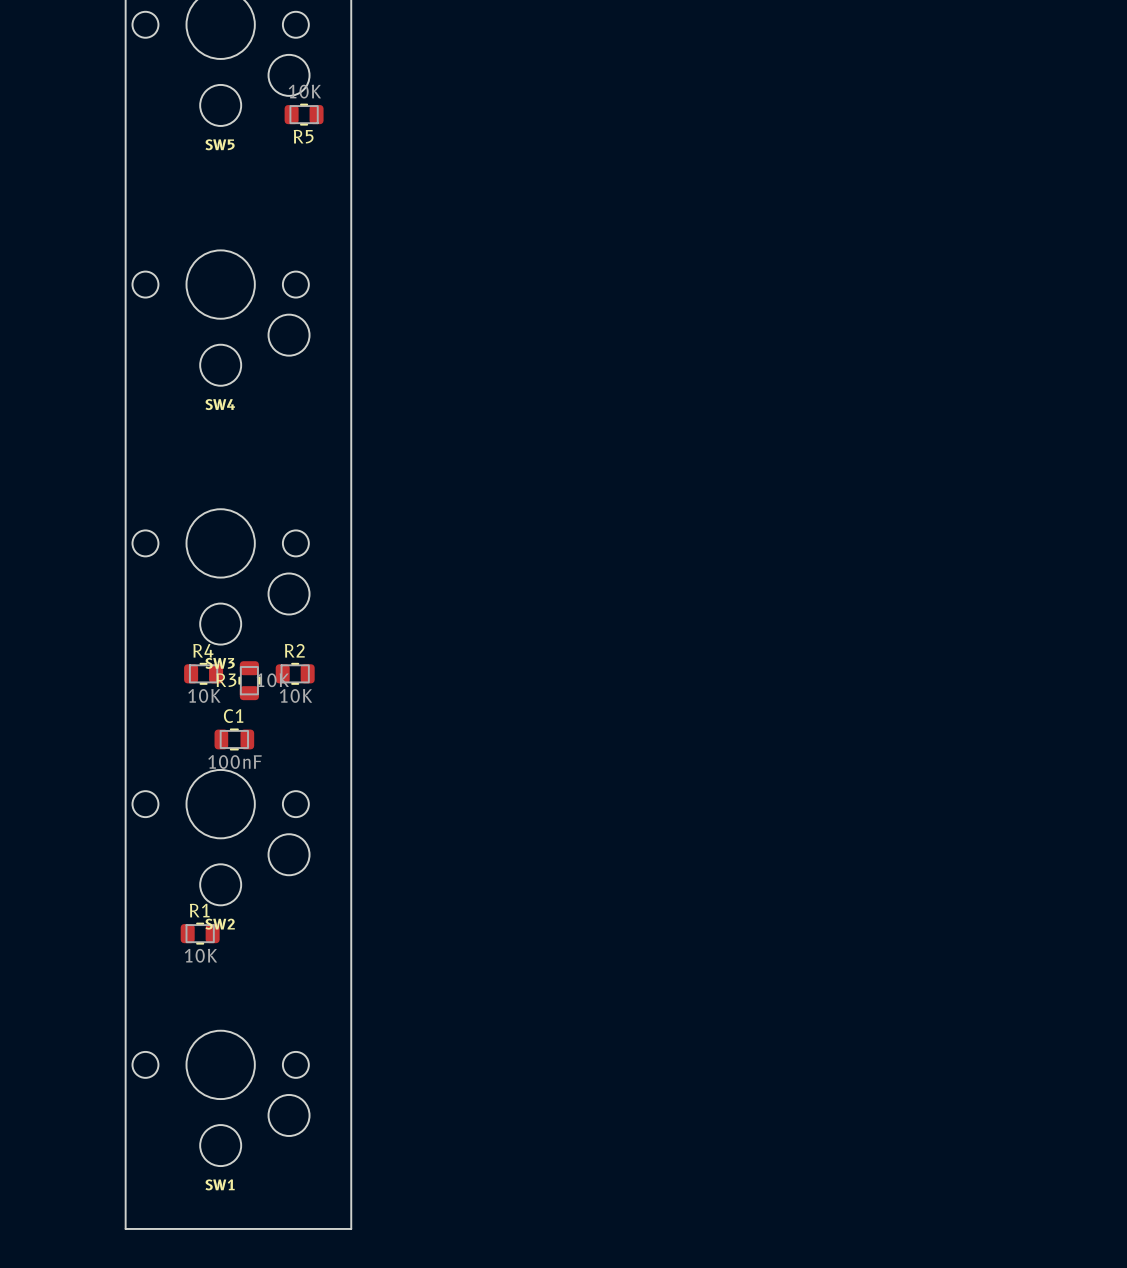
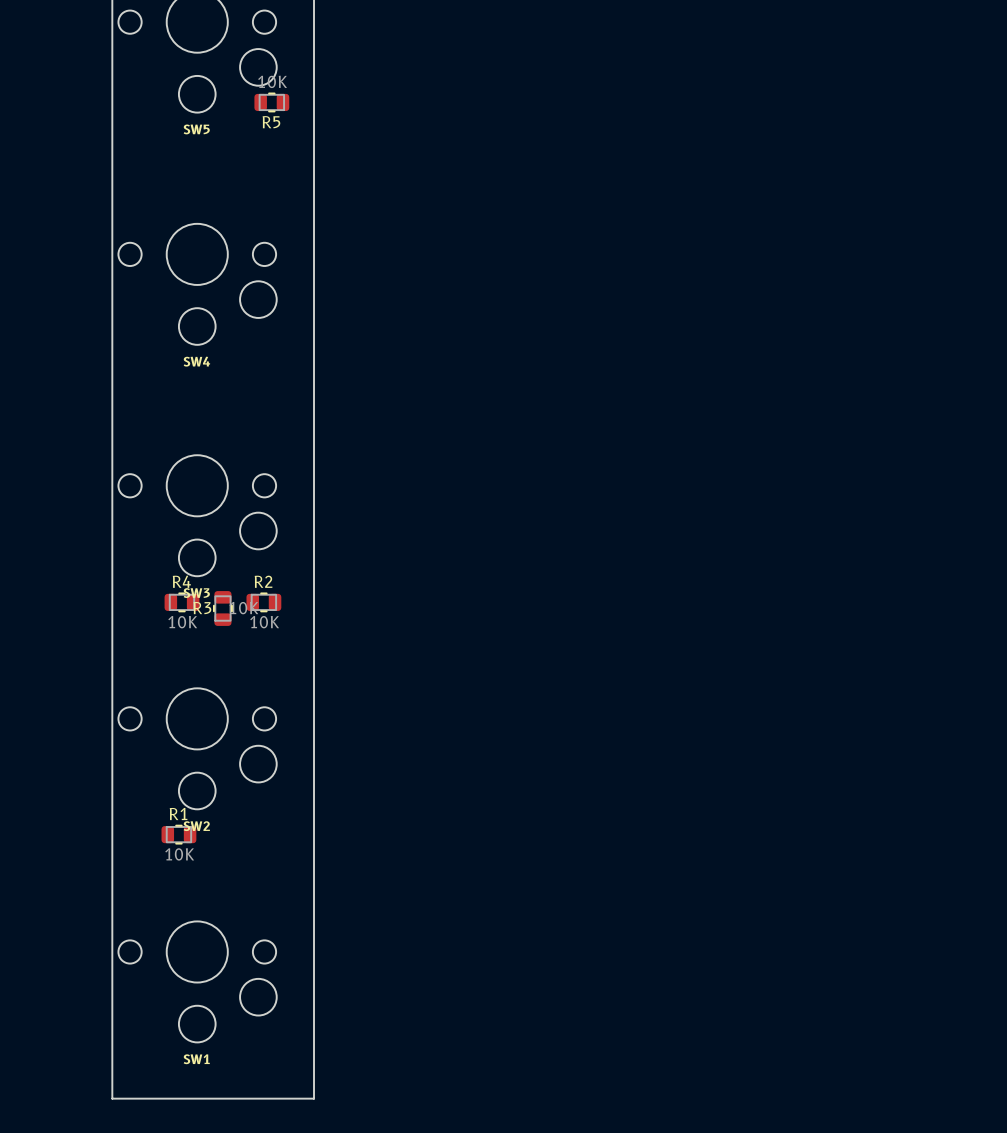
C1: 100nF (234, 739) -> none

